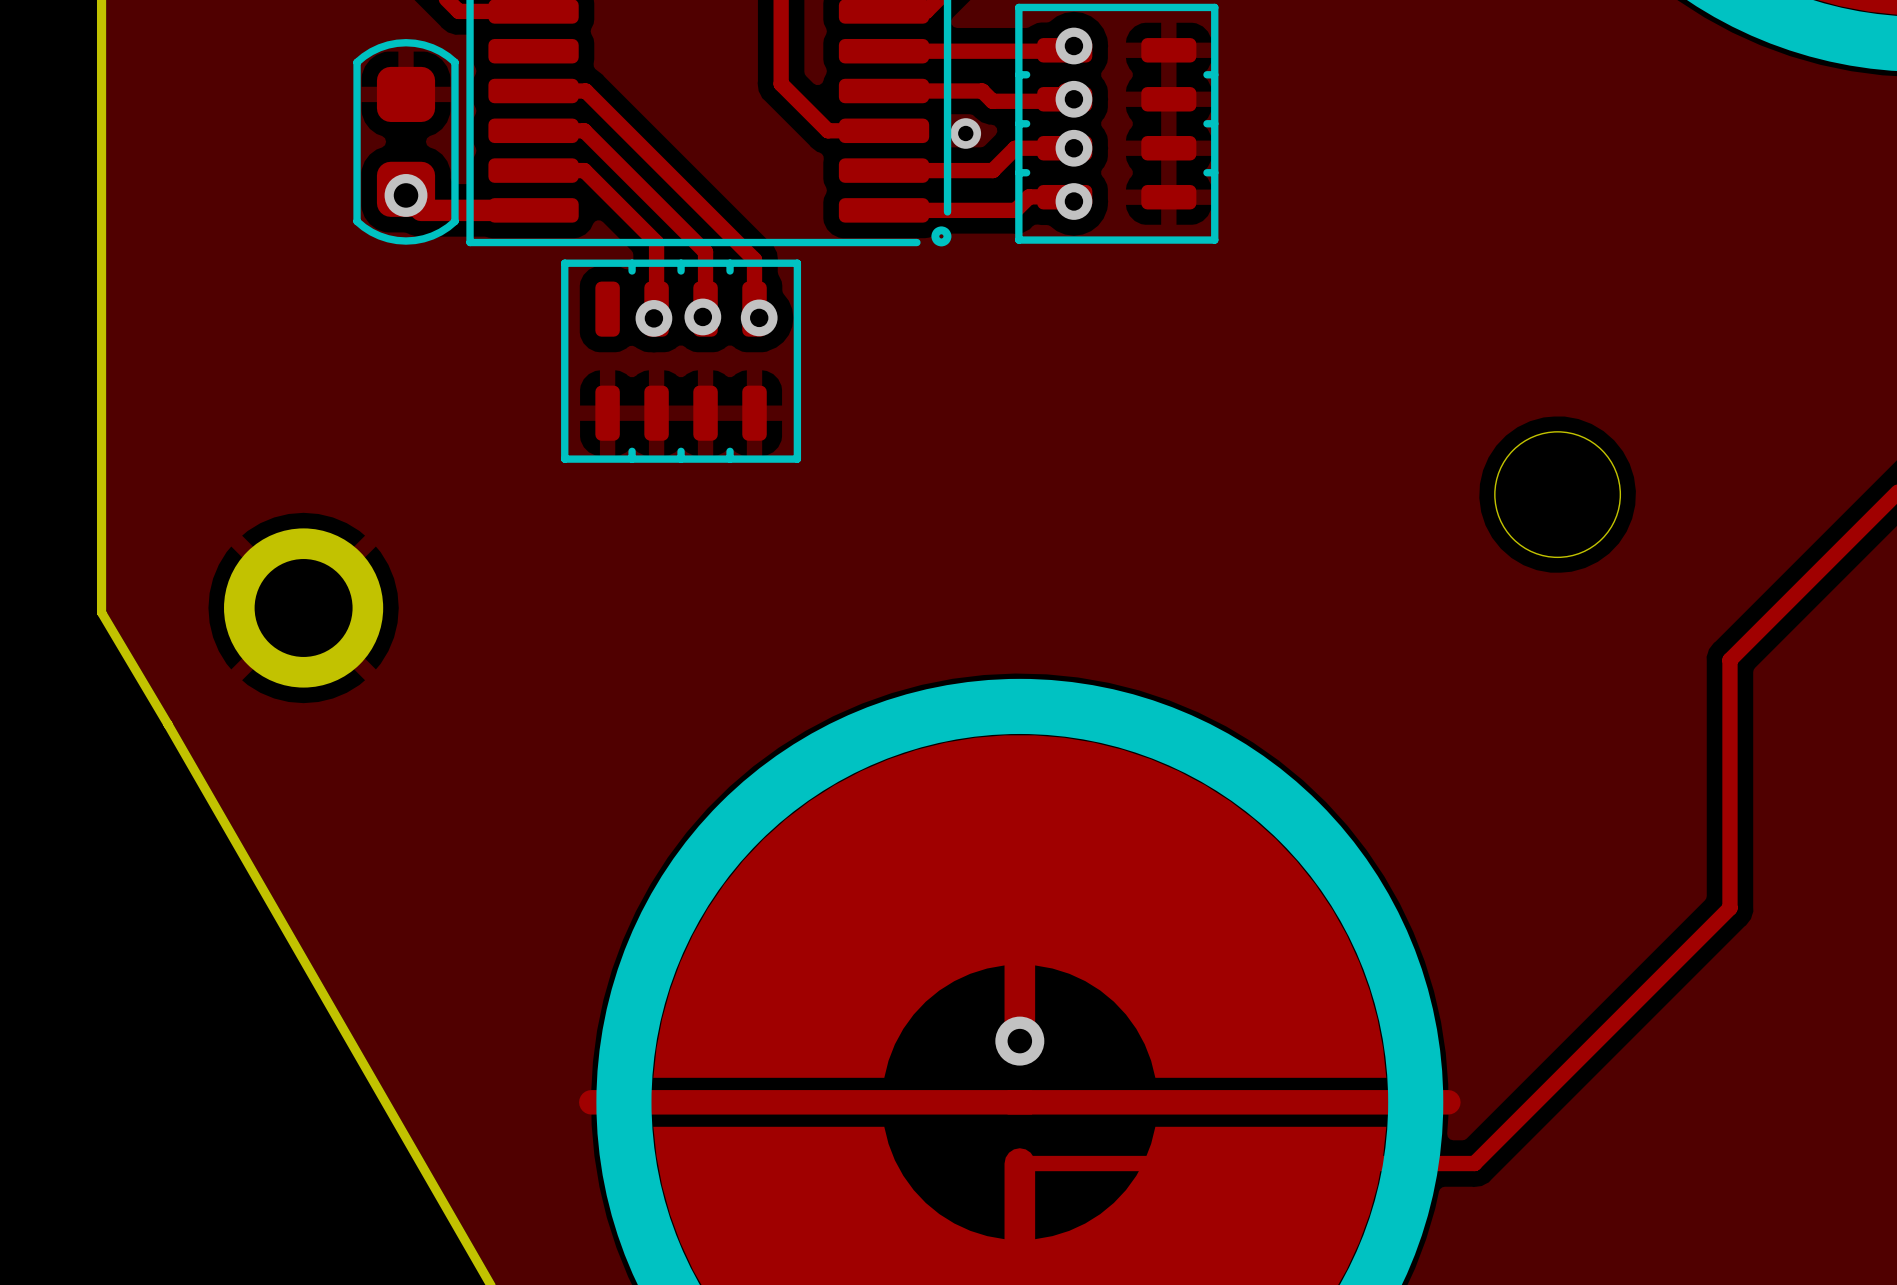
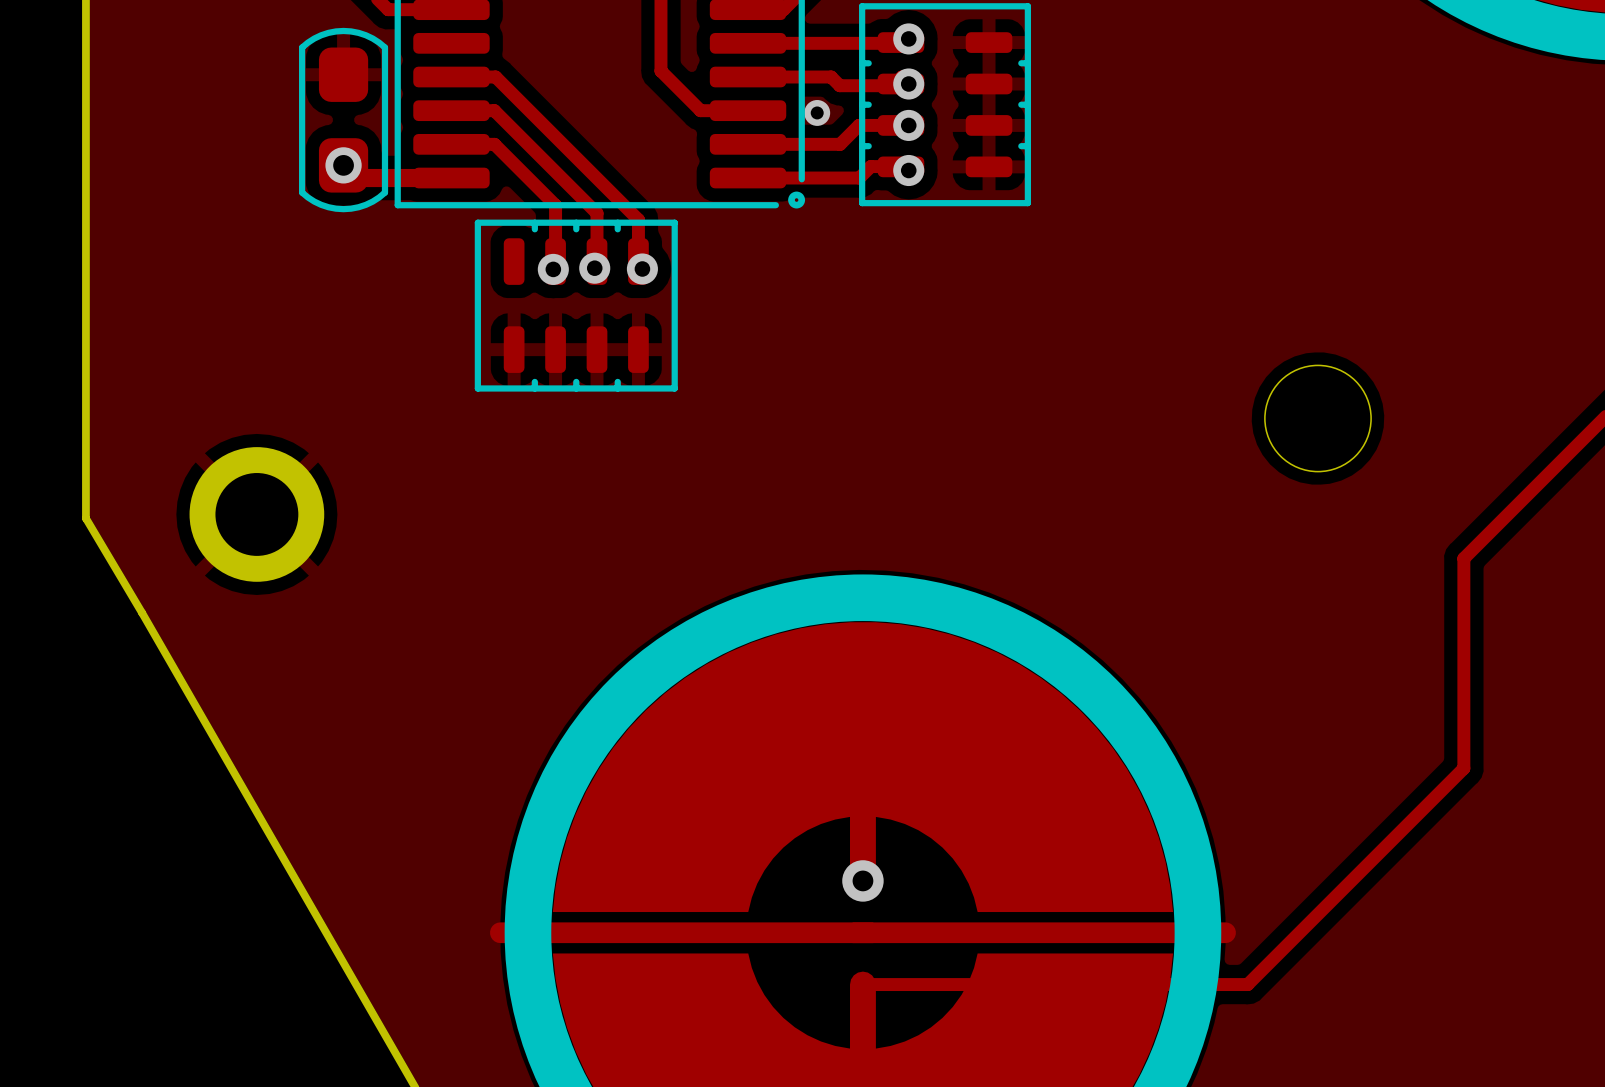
part footprint: [353, 39, 459, 245] -> [299, 27, 389, 213]

